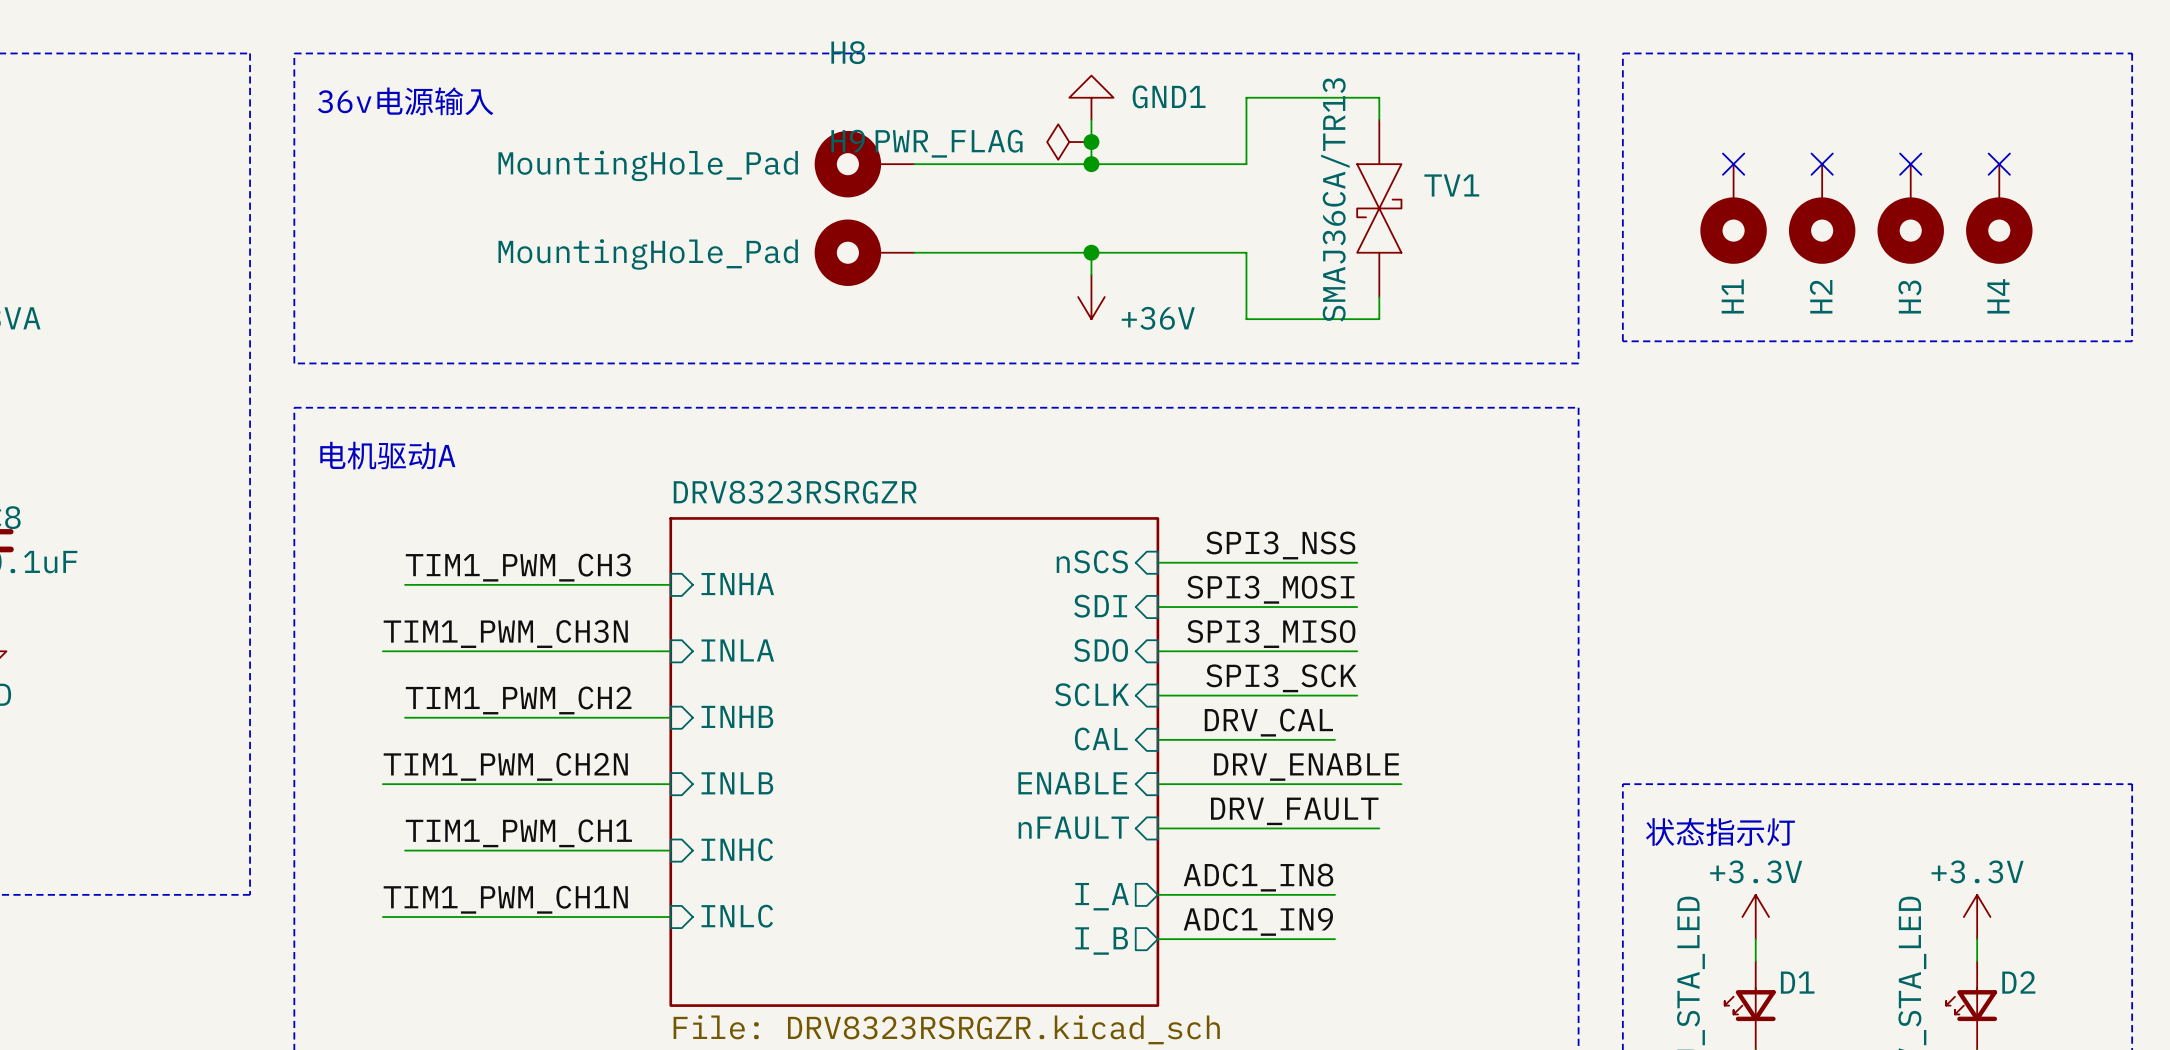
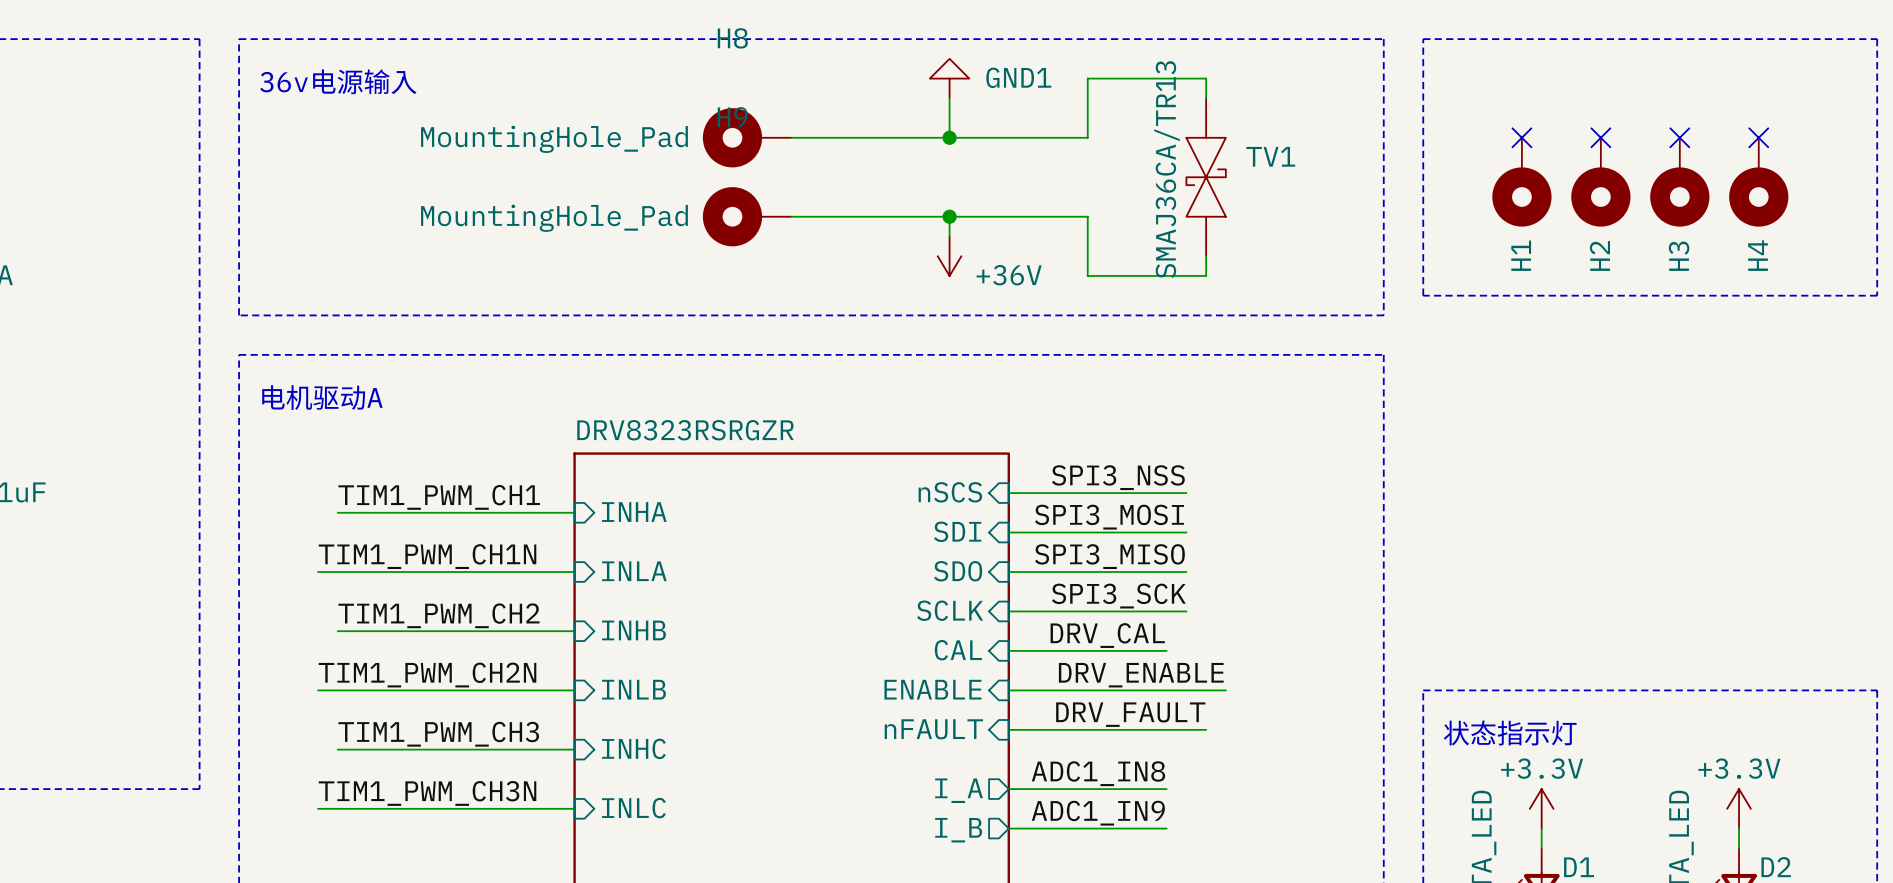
power symbol: PWR_FLAG (1069, 142) -> none
junction: (1091, 142) -> none
label: TIM1_PWM_CH3 (518, 567) -> TIM1_PWM_CH1 (439, 497)
label: TIM1_PWM_CH3N (505, 634) -> TIM1_PWM_CH1N (427, 556)
label: TIM1_PWM_CH1 (518, 833) -> TIM1_PWM_CH3 (438, 734)
label: TIM1_PWM_CH1N (505, 899) -> TIM1_PWM_CH3N (427, 793)

